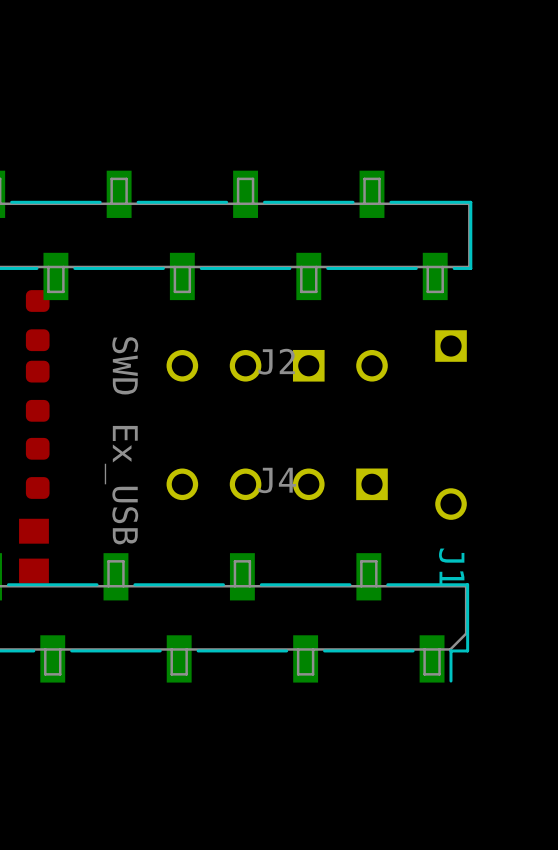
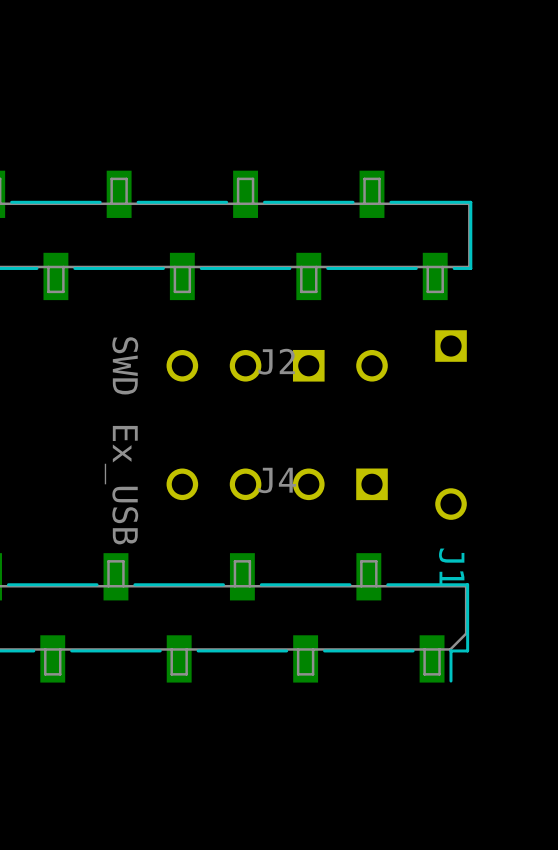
part: (37, 320) -> none
part: (37, 391) -> none
part: (37, 468) -> none
part: (33, 551) -> none

